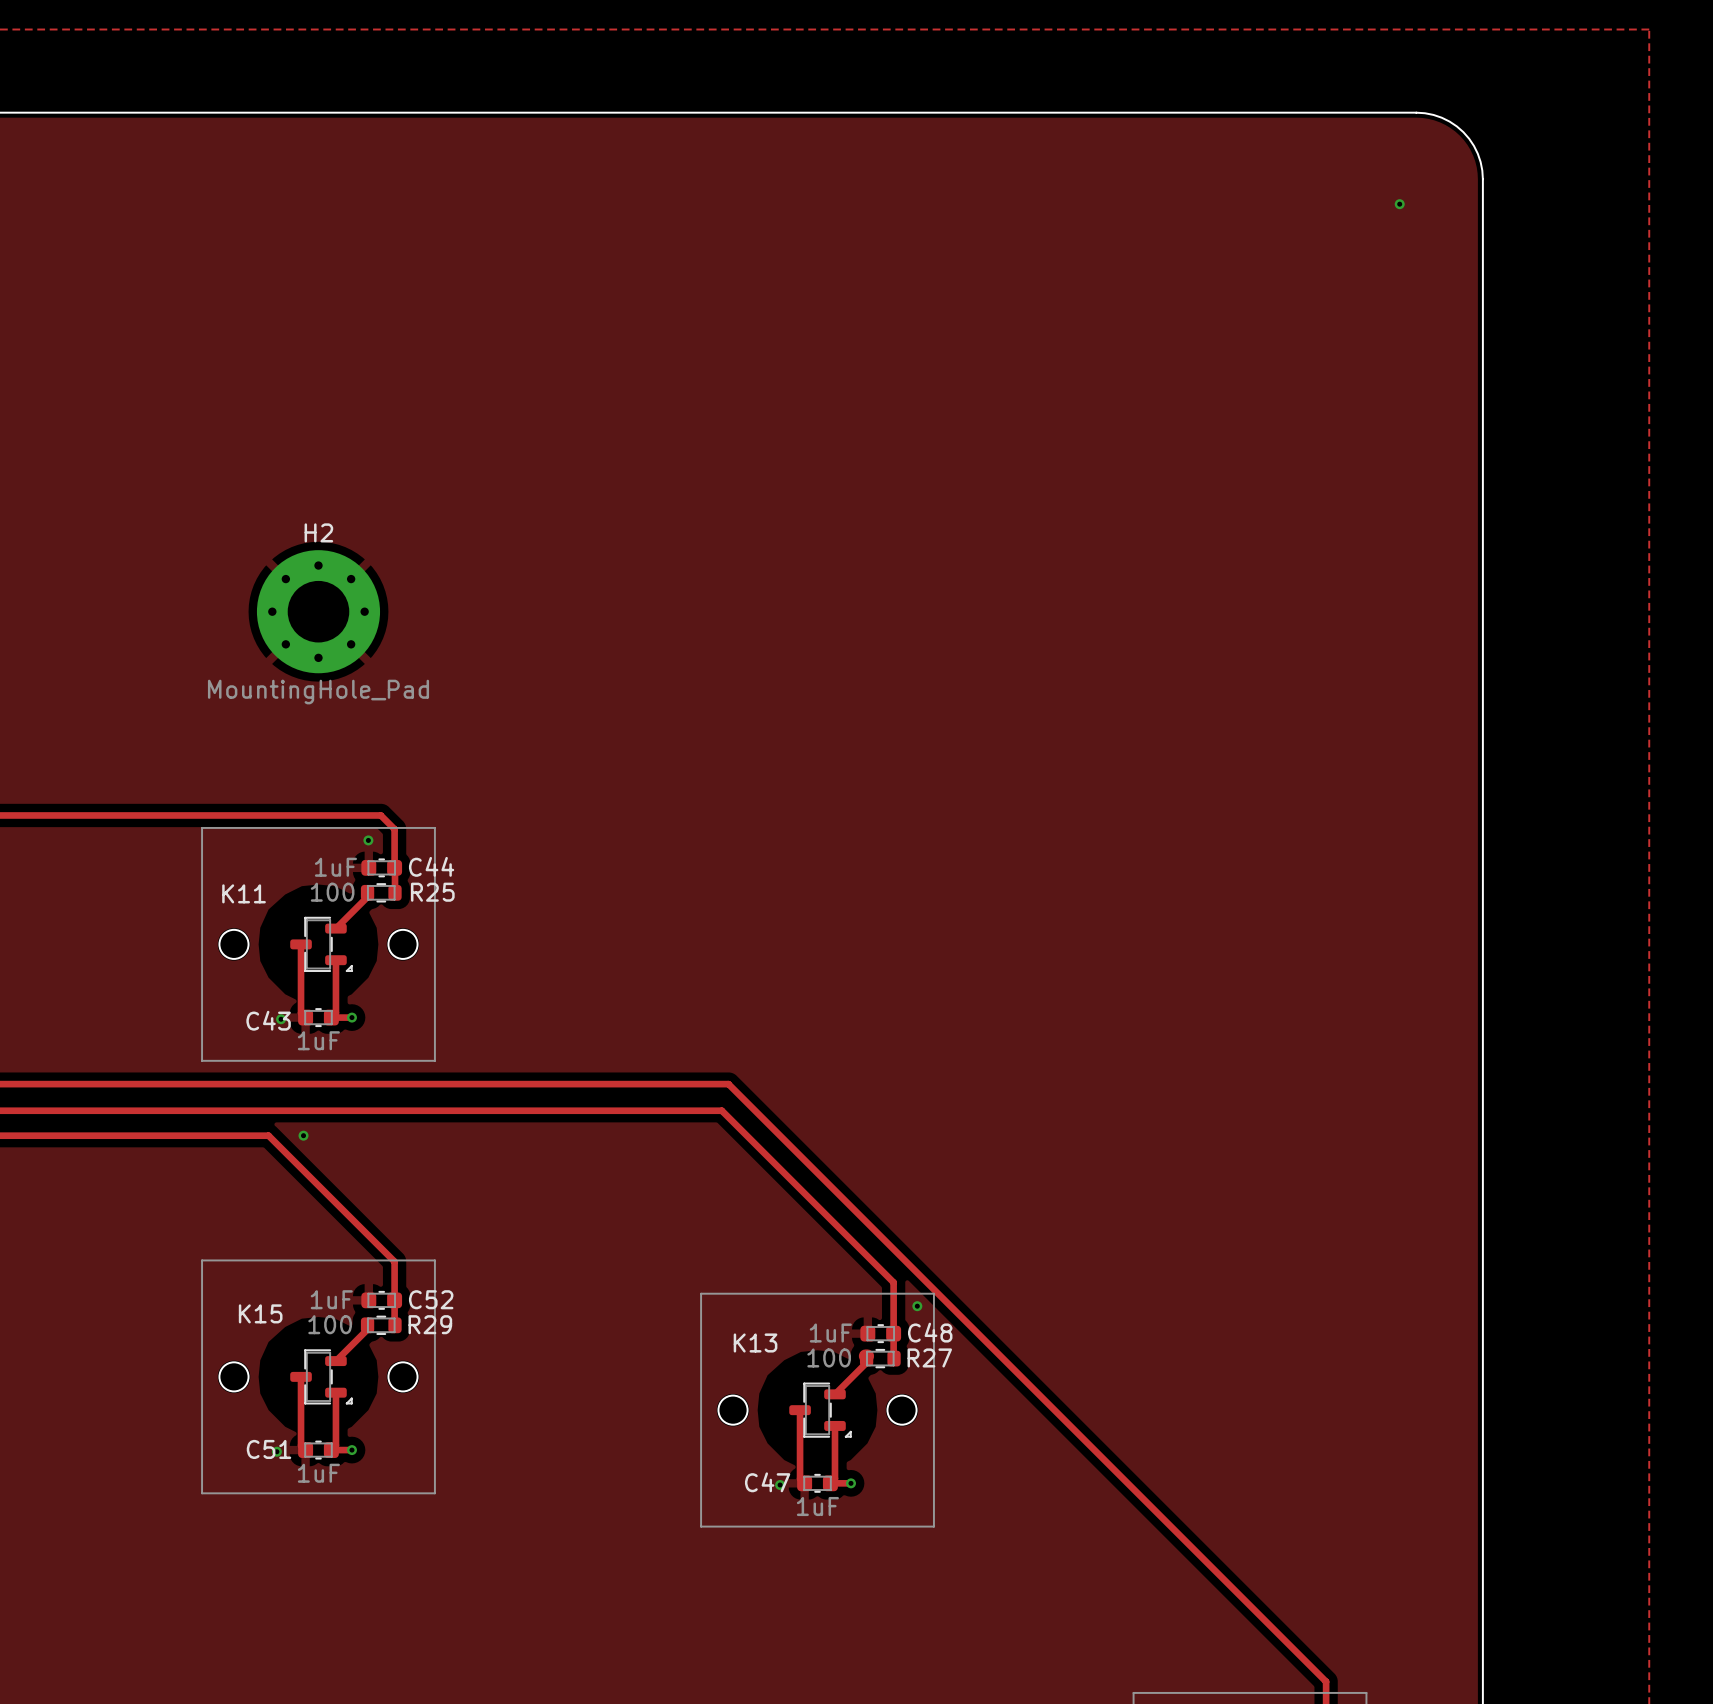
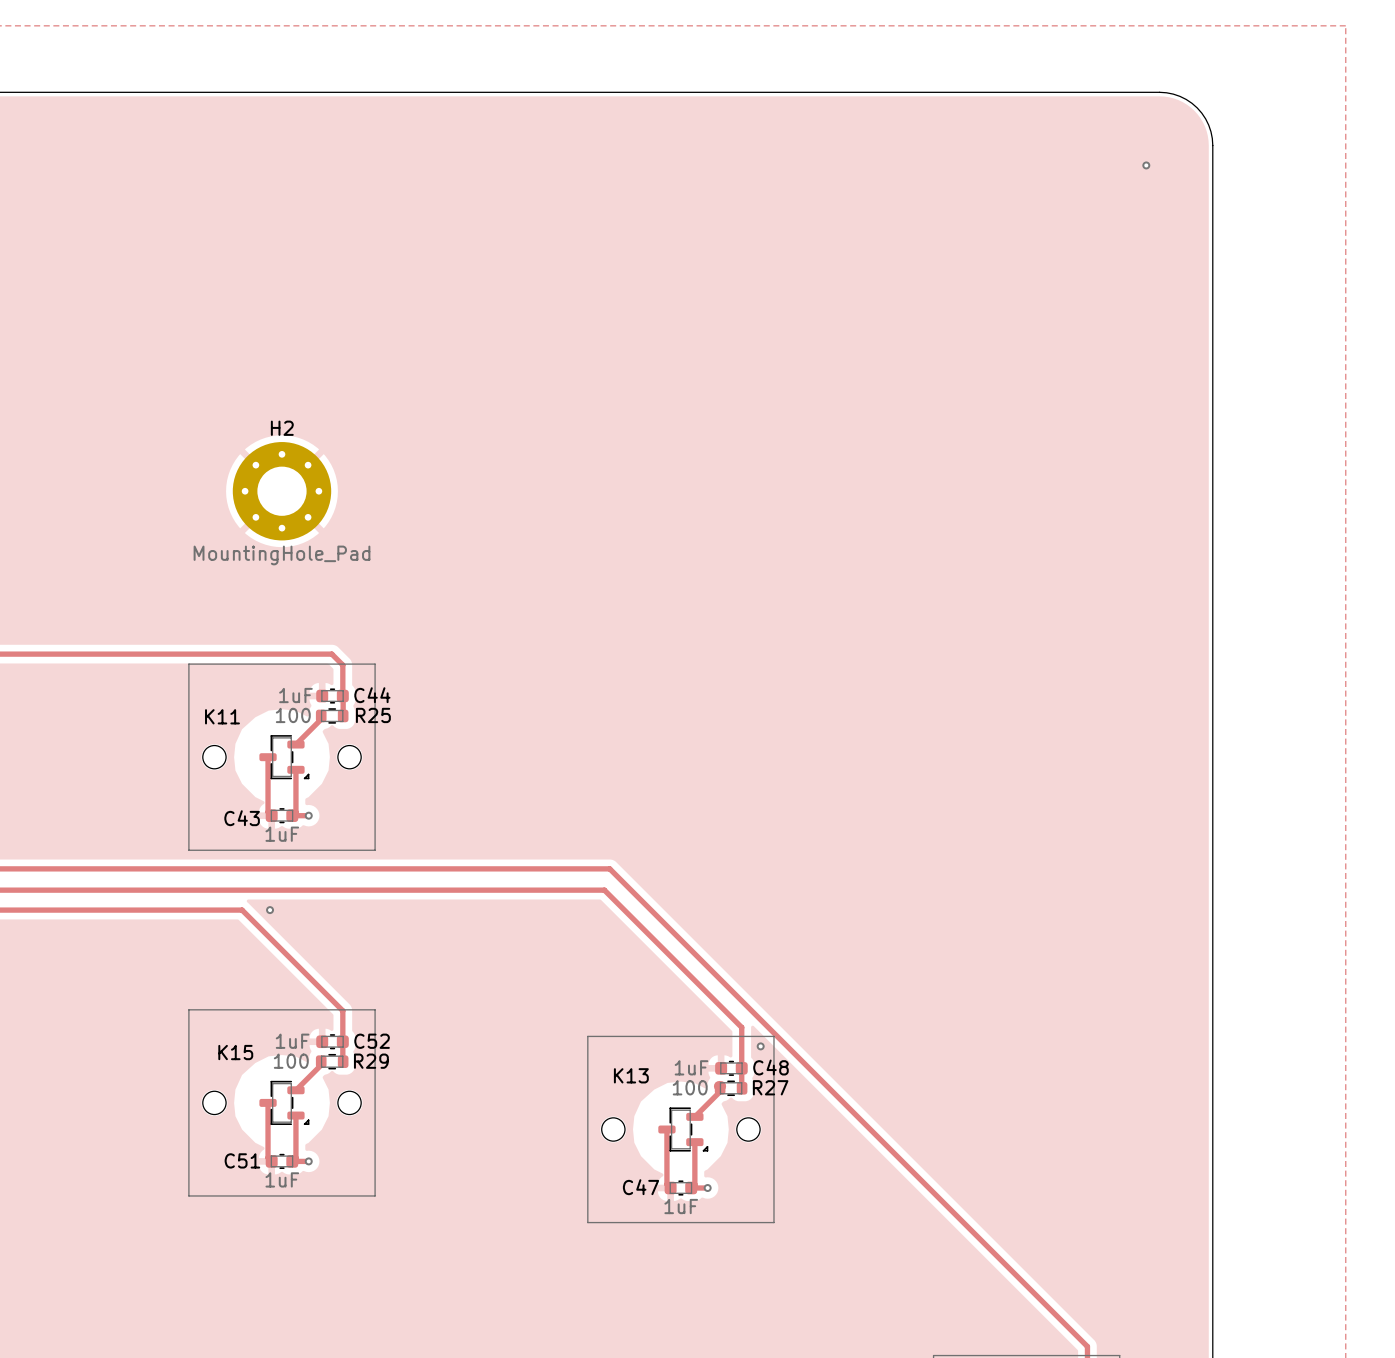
via: (368, 840) -> none
via: (281, 1019) -> none
via: (276, 1451) -> none
via: (780, 1485) -> none

